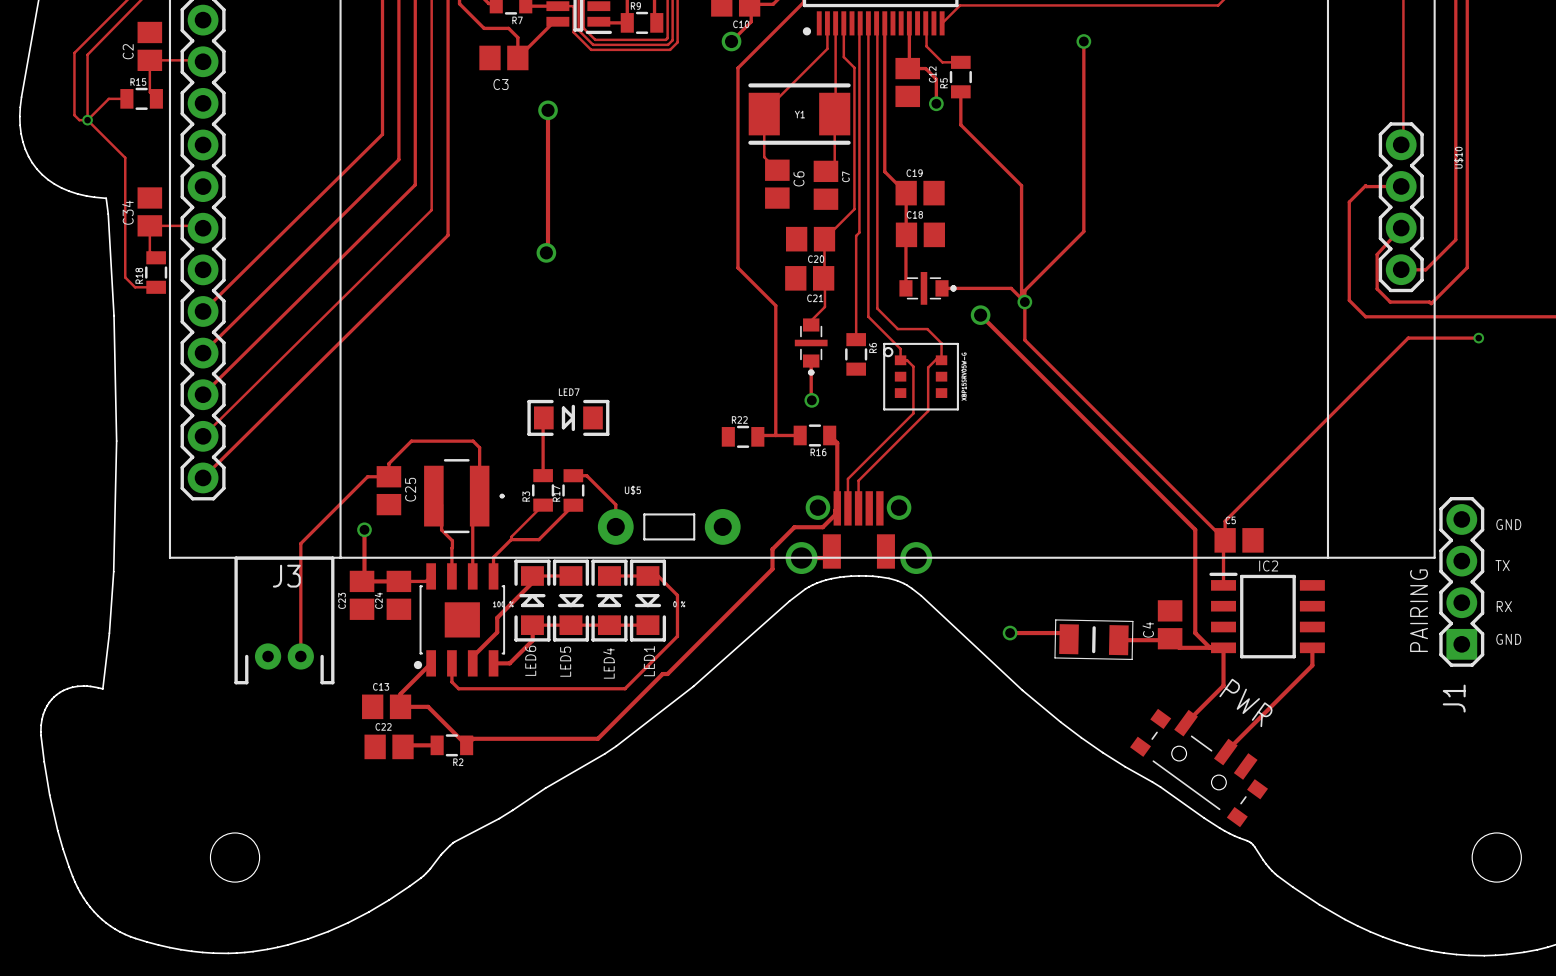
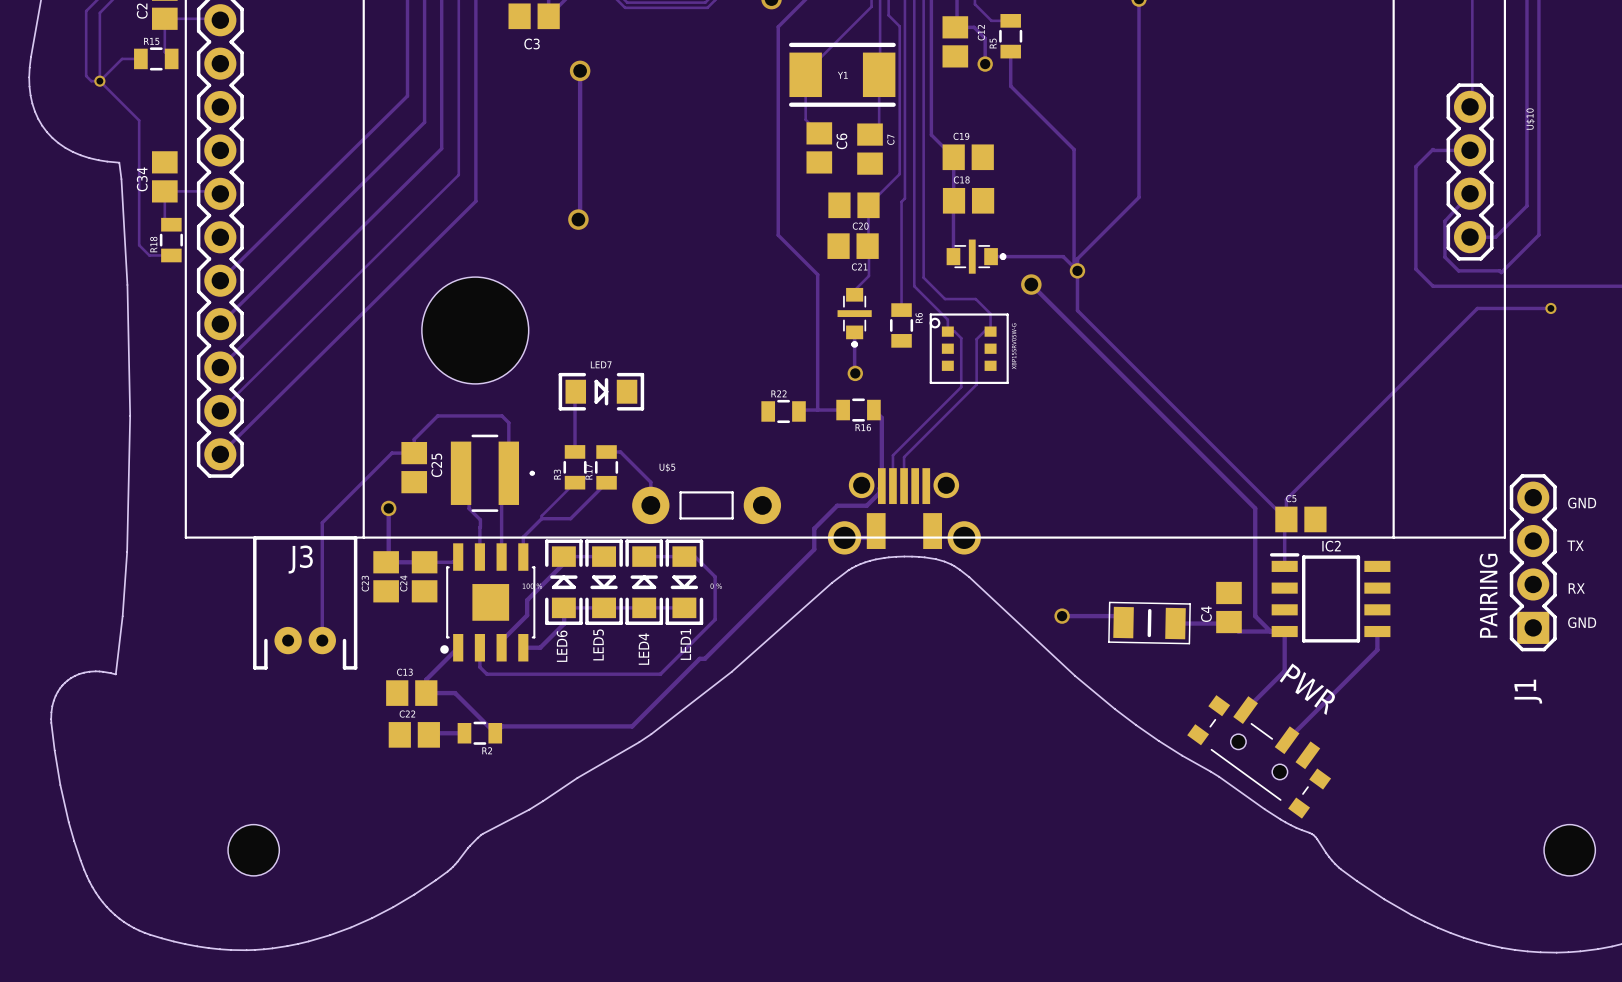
hole: none -> (475, 330)

